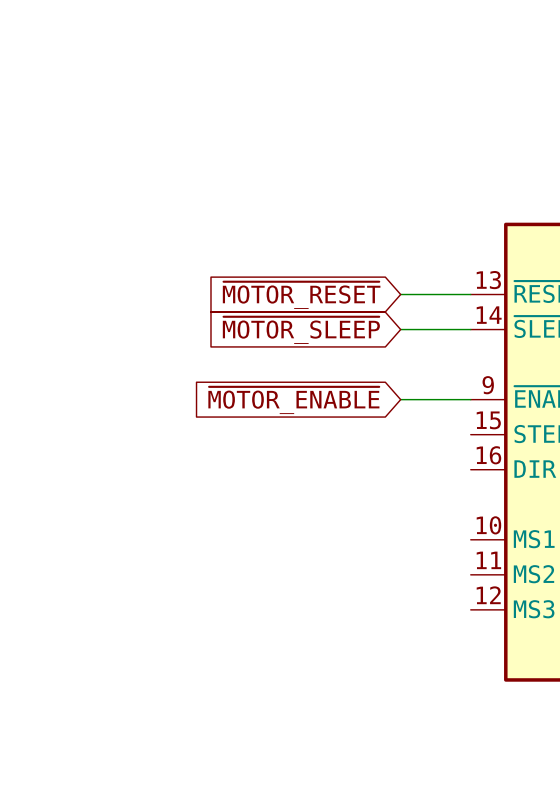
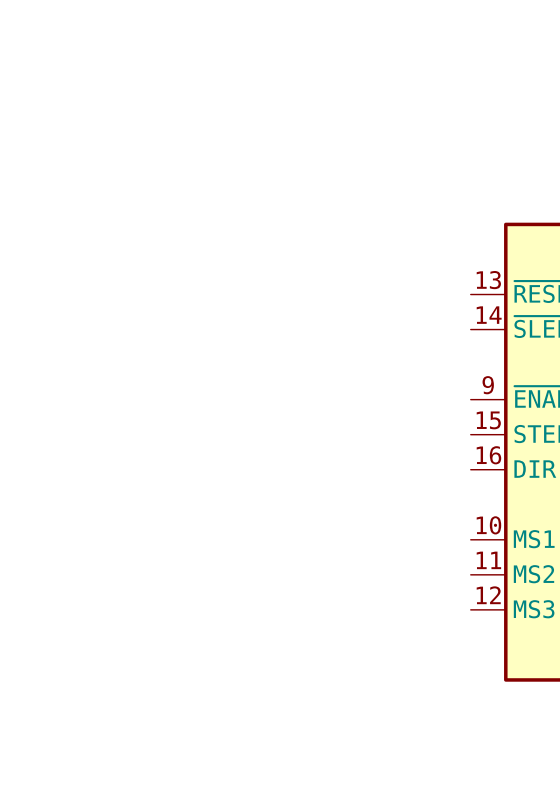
wire: (400, 294) (470, 294) -> none
global label: ~{MOTOR_RESET} (301, 295) -> none
wire: (400, 329) (470, 329) -> none
global label: ~{MOTOR_SLEEP} (301, 330) -> none
wire: (400, 399) (470, 399) -> none
global label: ~{MOTOR_ENABLE} (293, 400) -> none

